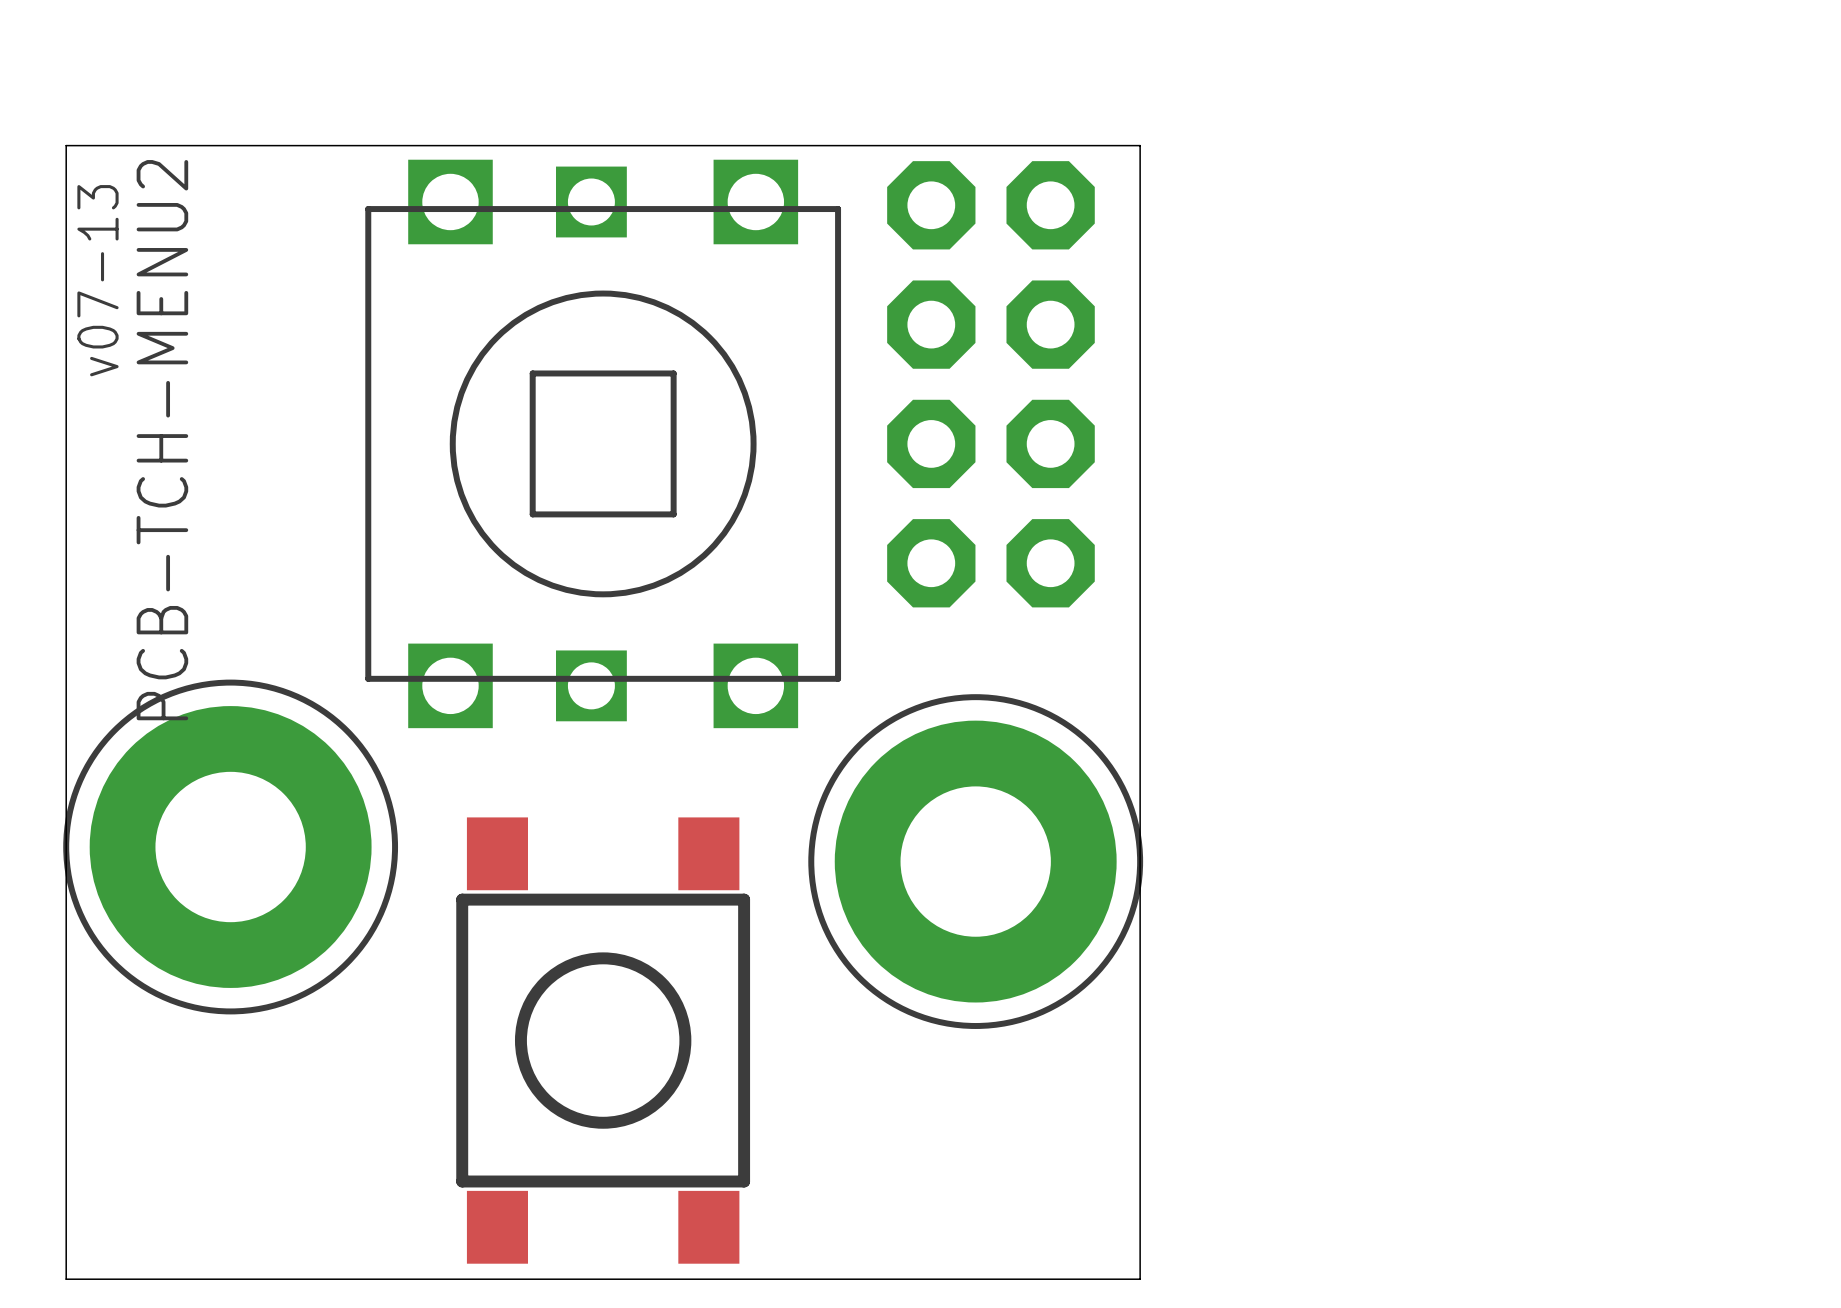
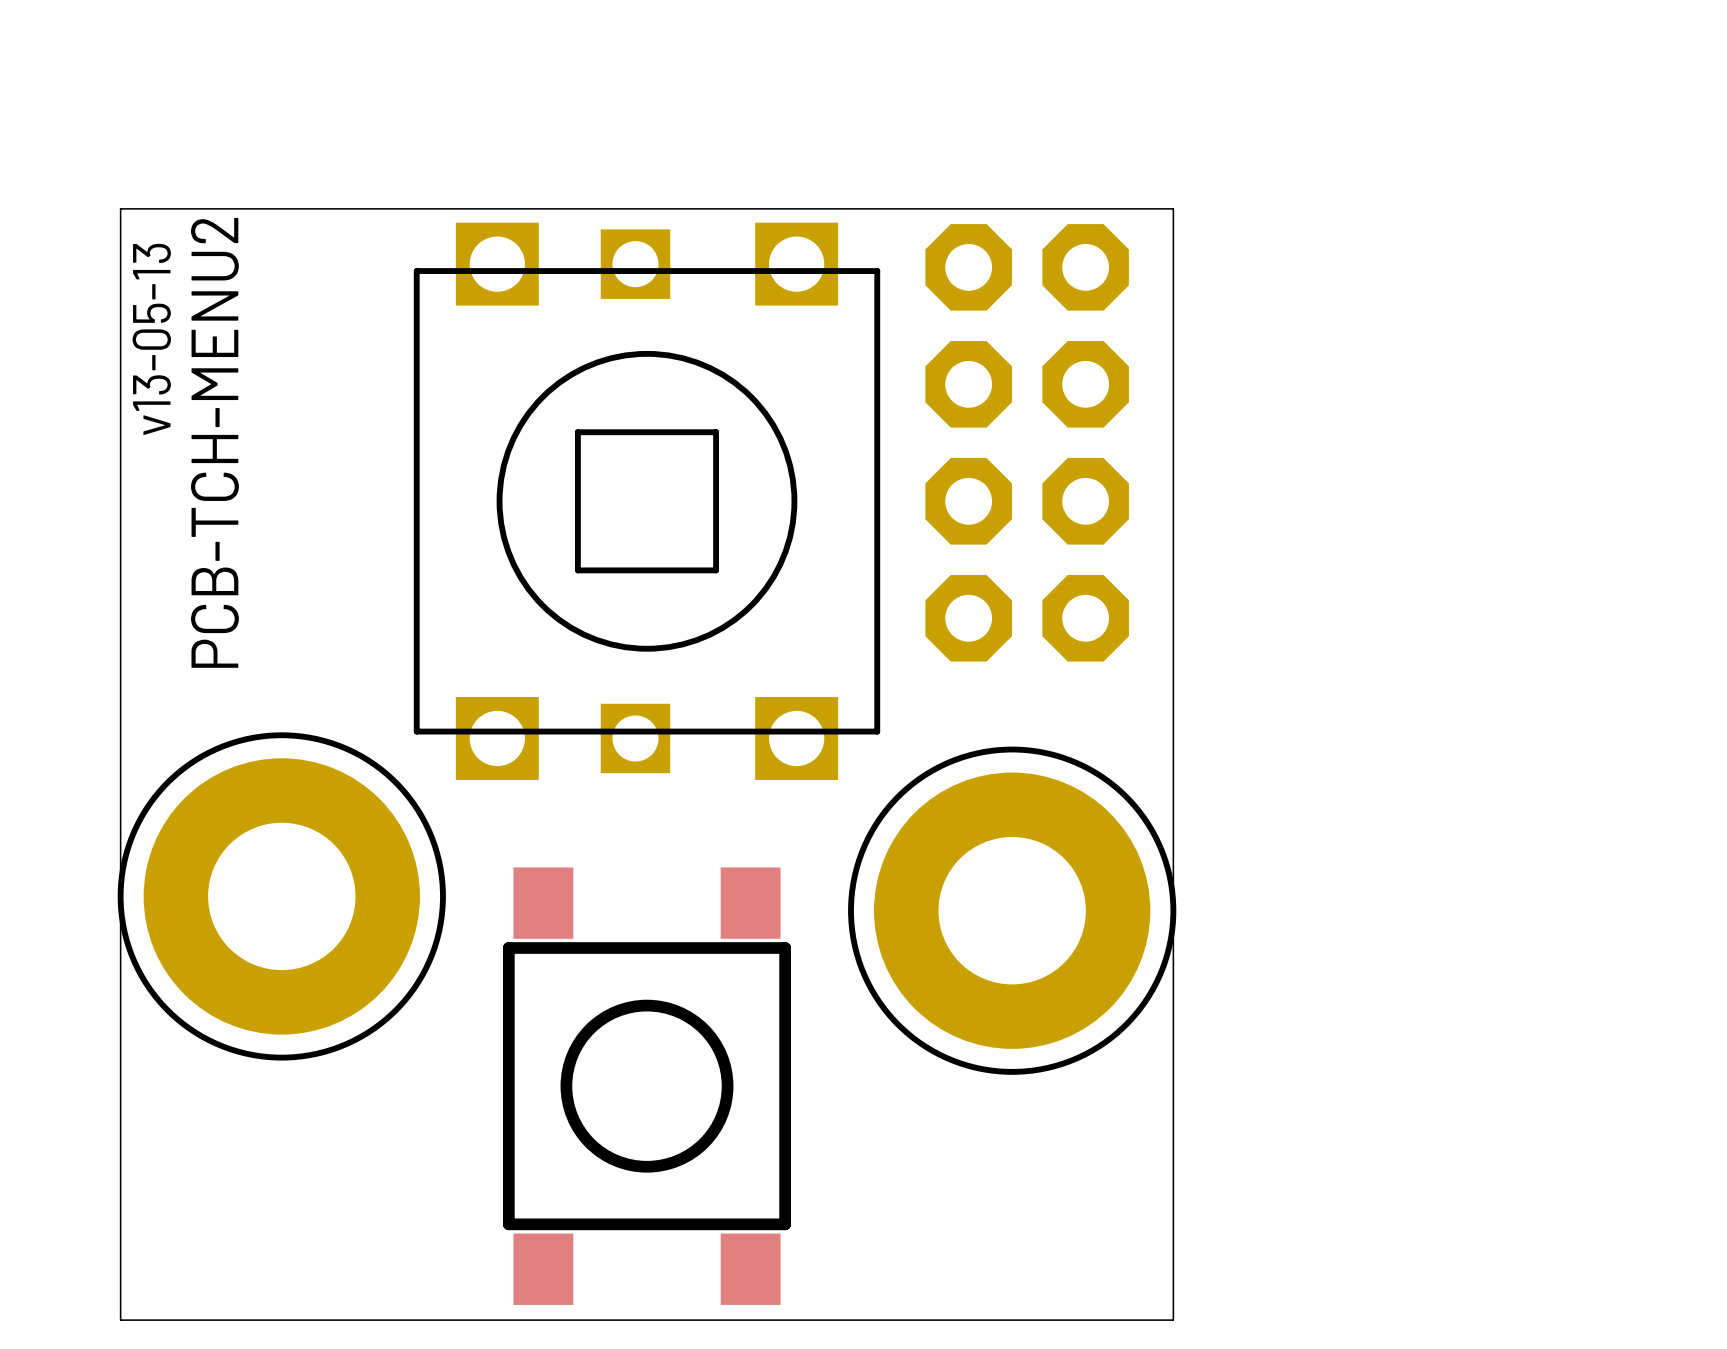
text: v07-13 (97, 280) -> v13-05-13 (151, 339)

